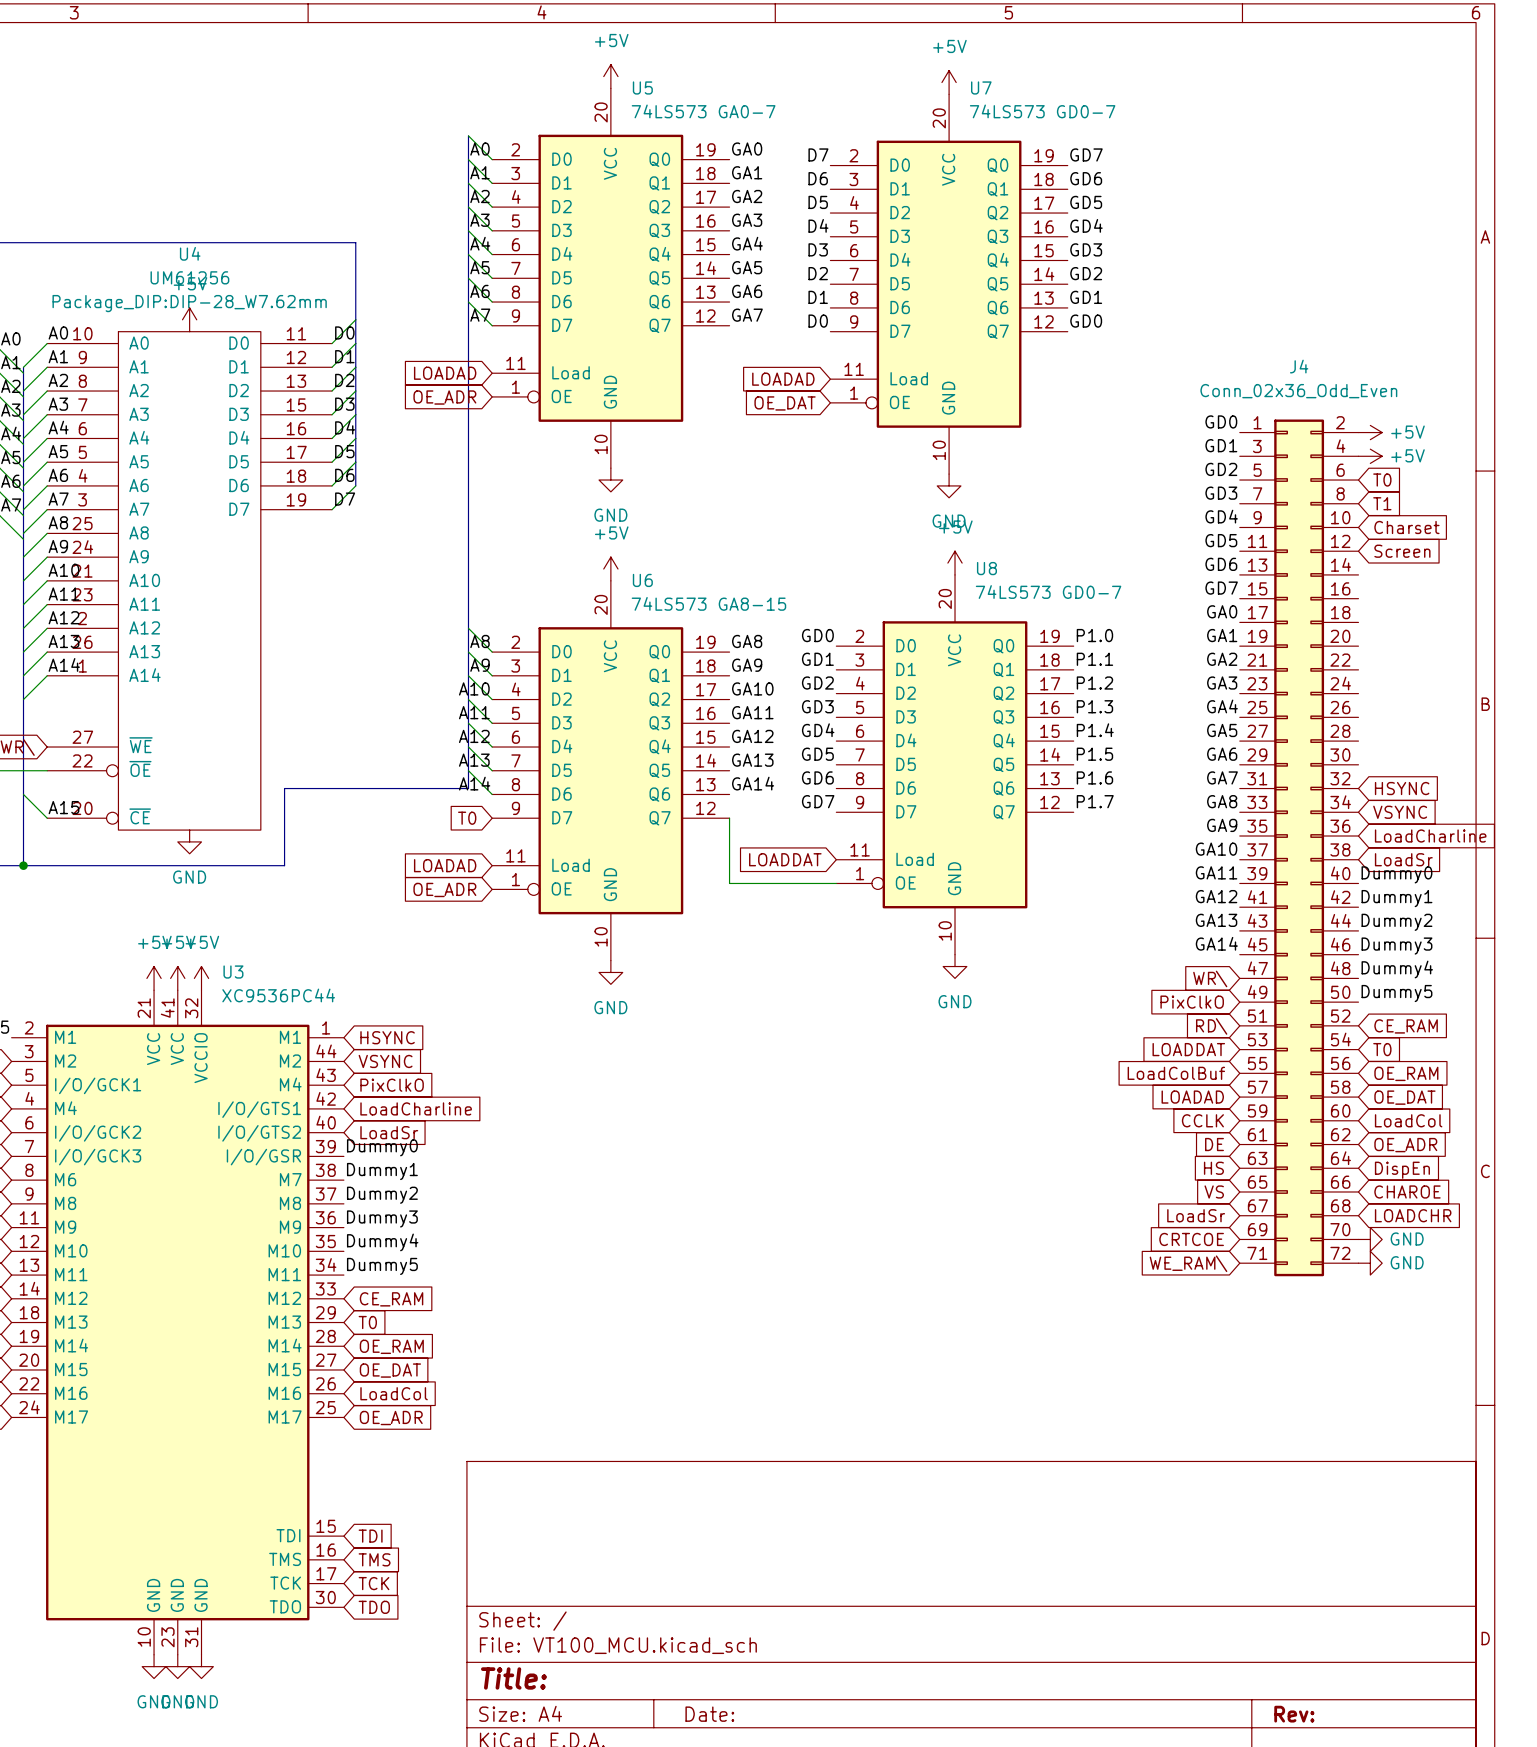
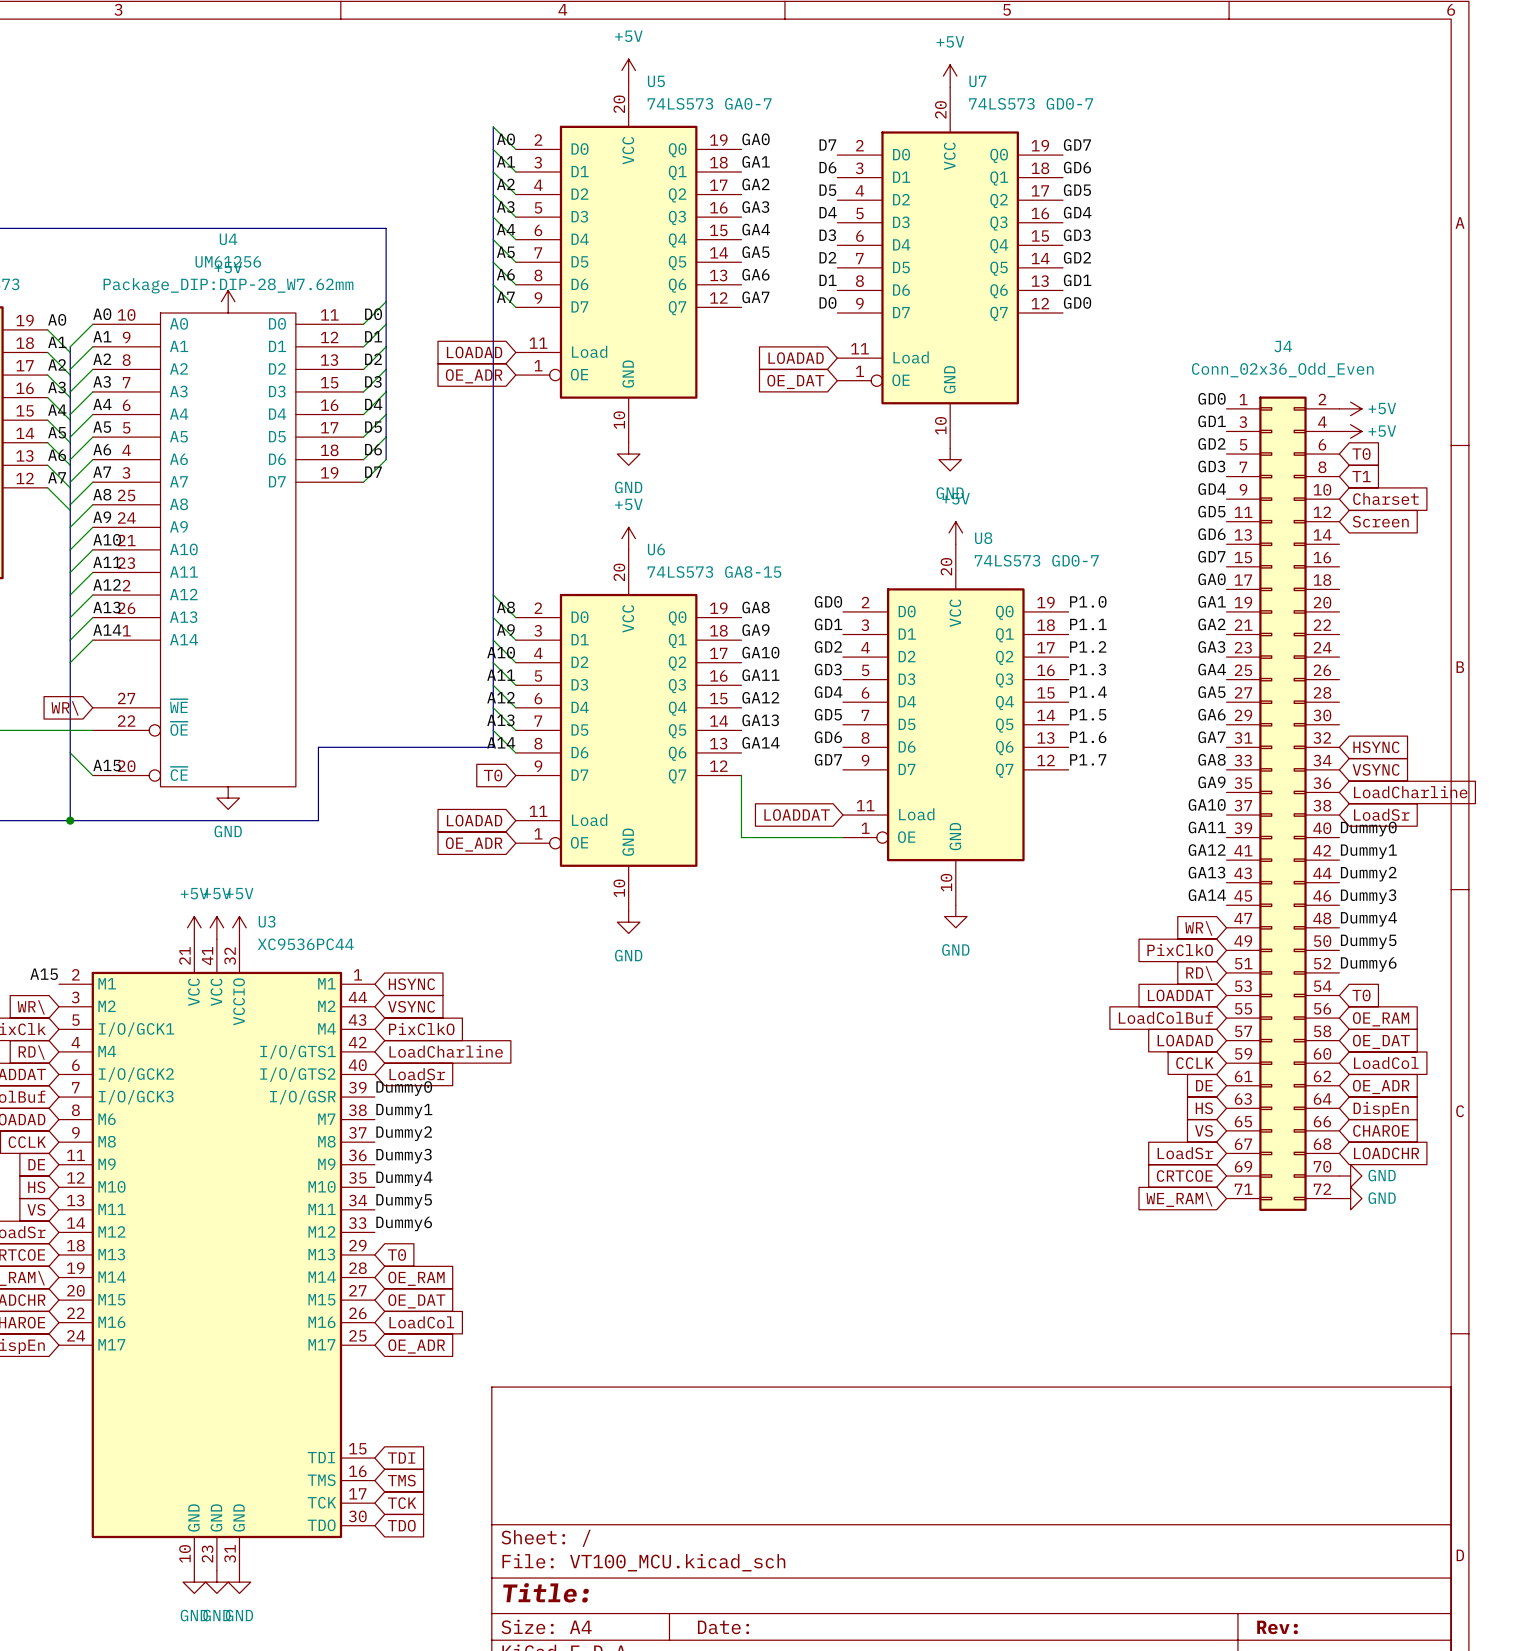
label: none -> Dummy6 (1368, 964)
global label: CE_RAM (1406, 1026) -> none
label: none -> Dummy6 (404, 1223)
global label: CE_RAM (391, 1299) -> none

